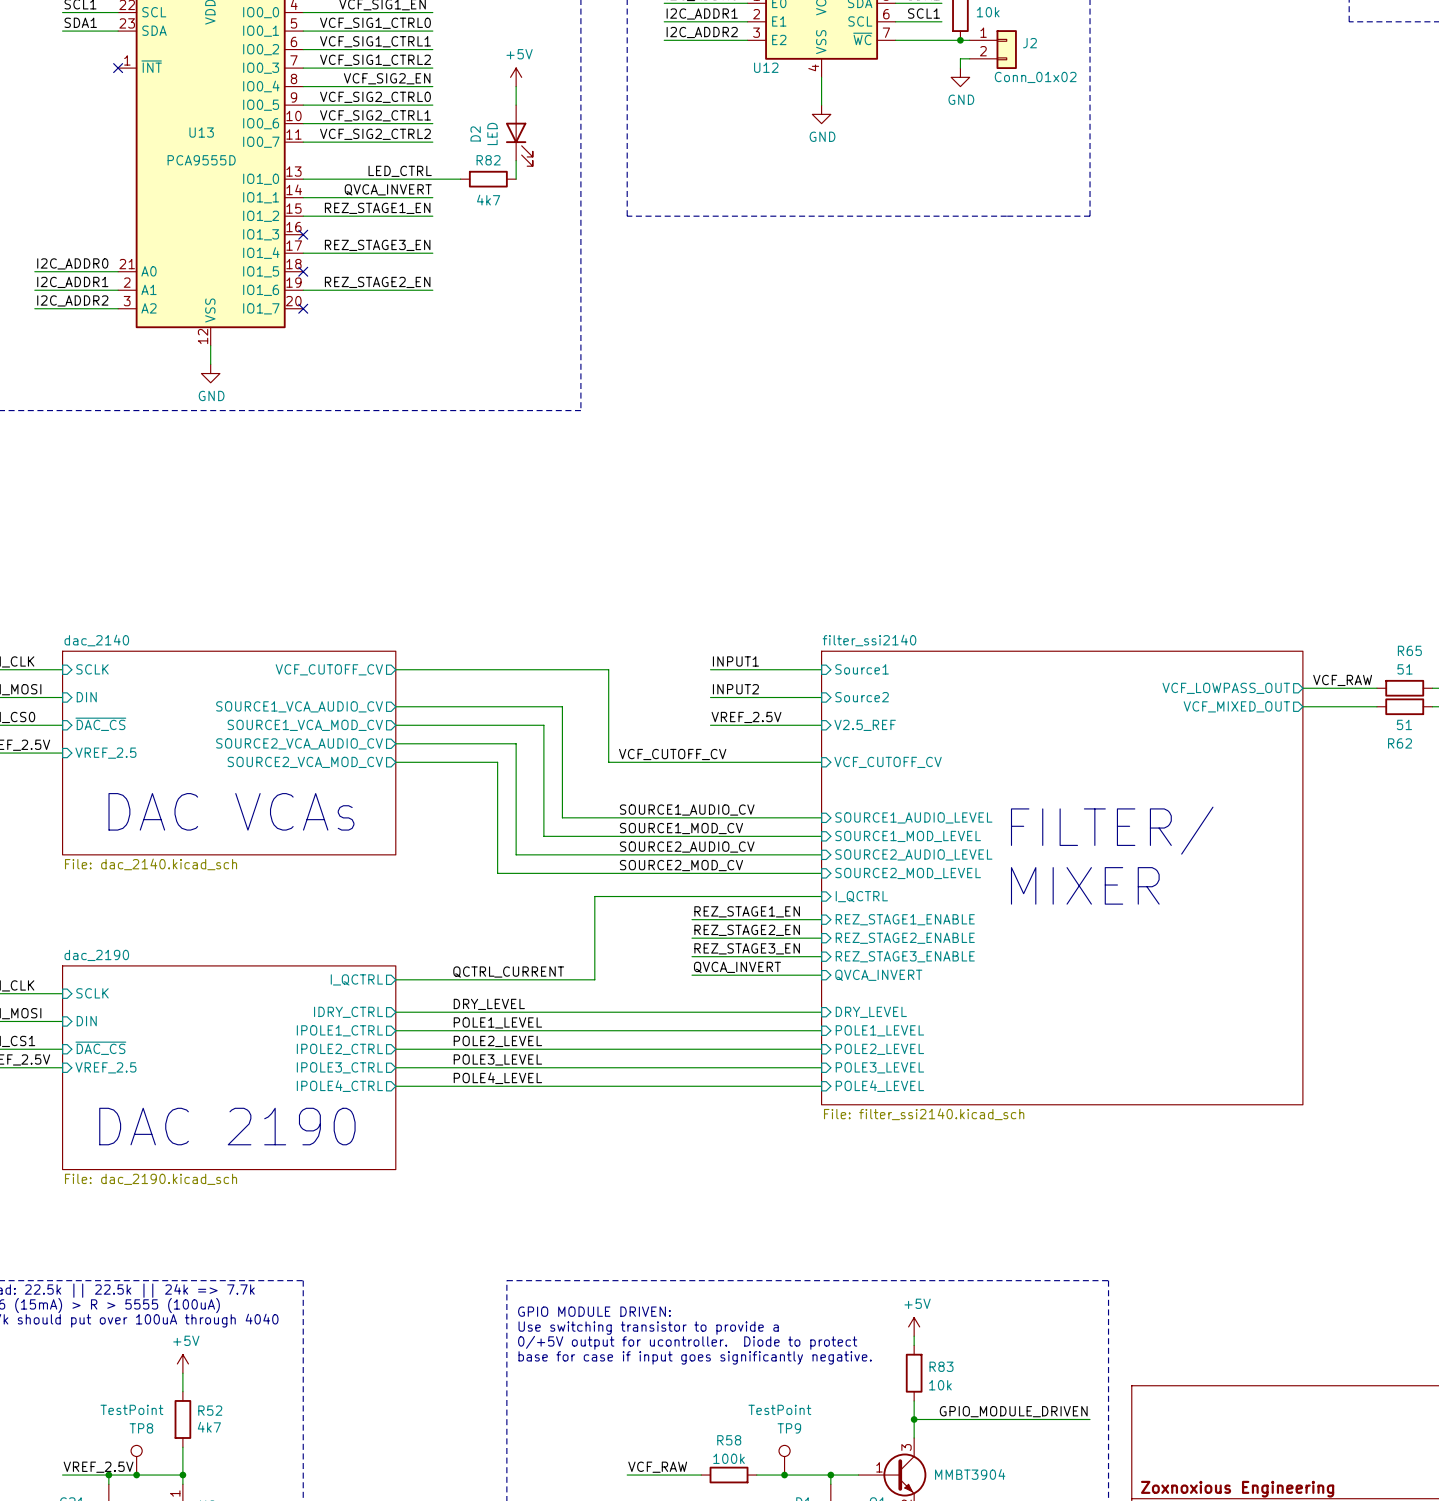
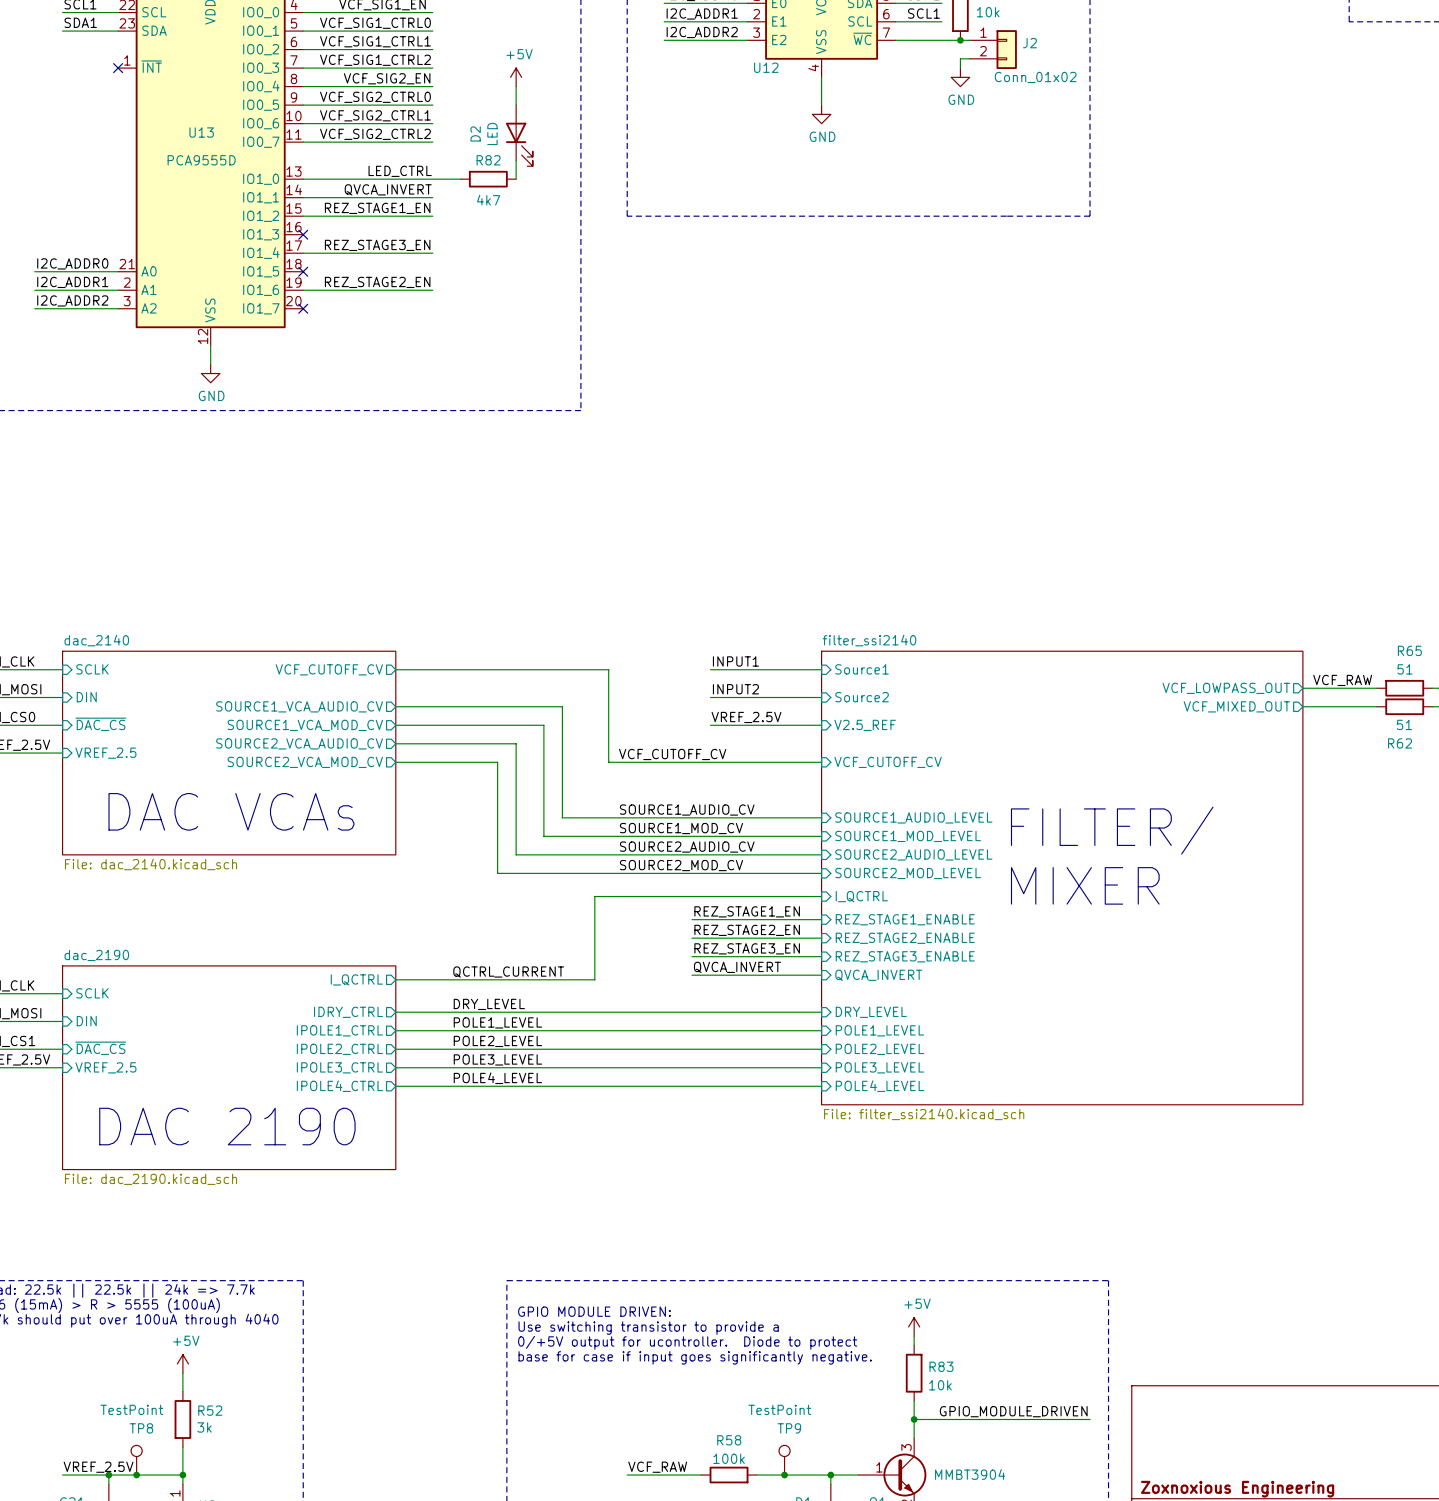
R52 value: 4k7 (209, 1427) -> 3k (204, 1427)

